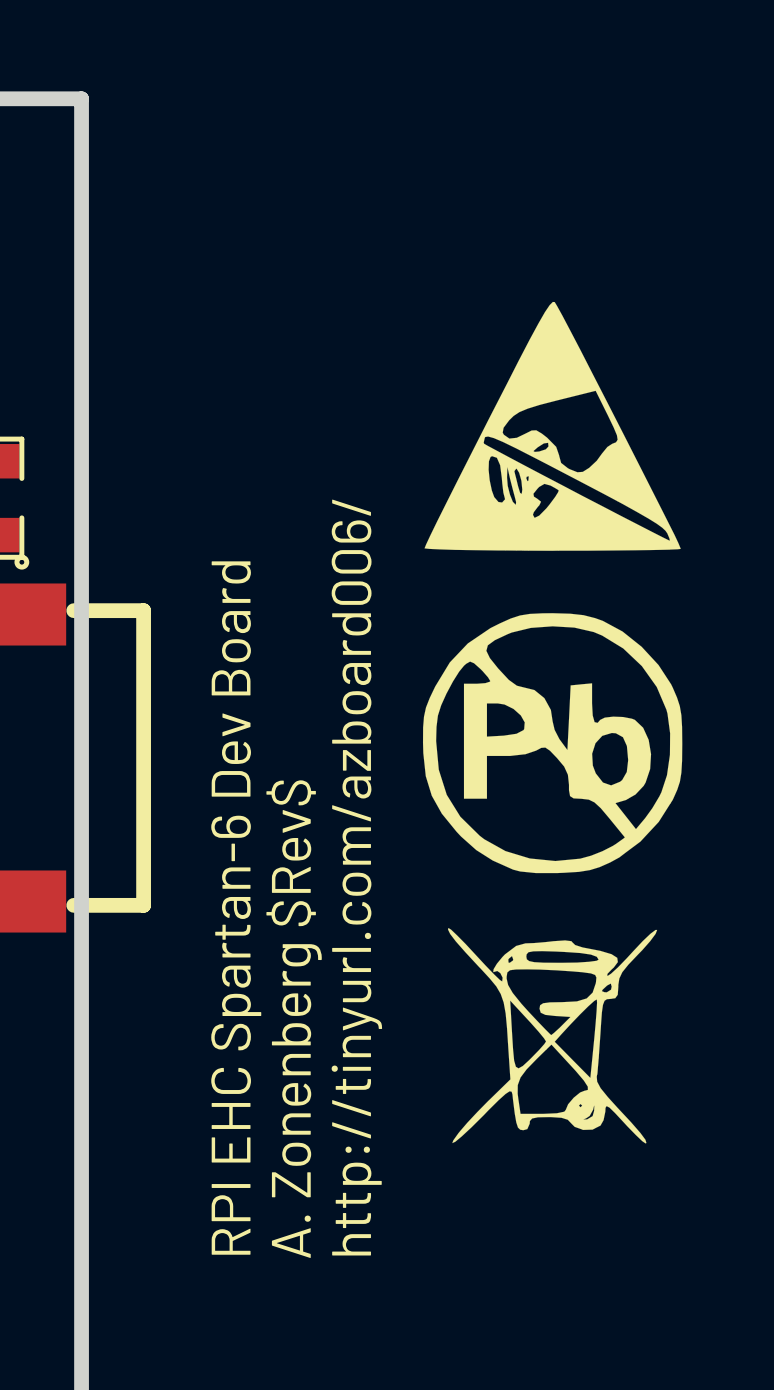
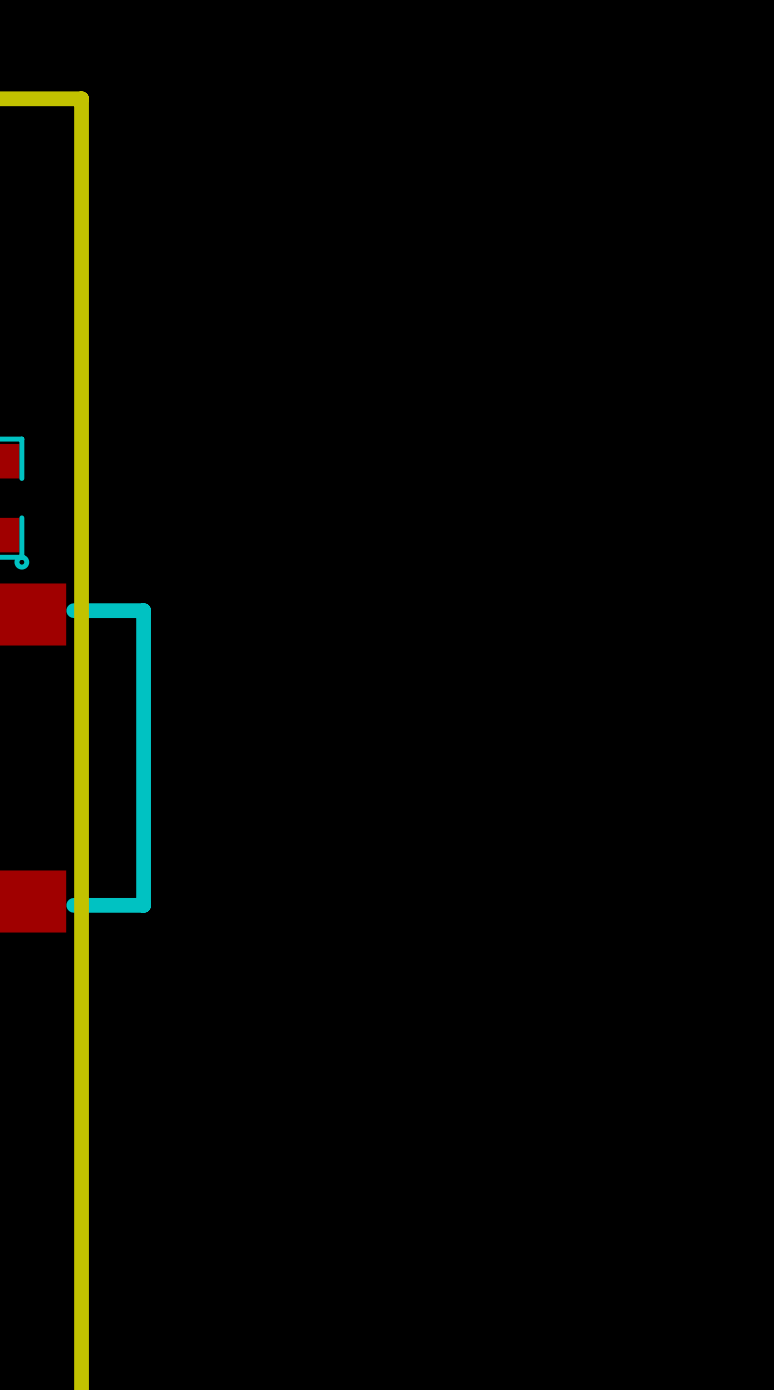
drawing: [424, 301, 681, 551] -> none
drawing: [422, 613, 683, 874] -> none
text: http://tinyurl.com/azboard006/ (356, 877) -> none
text: RPI EHC Spartan-6 Dev Board (236, 908) -> none
drawing: [447, 927, 658, 1144] -> none
text: A. Zonenberg $Rev$ (294, 1019) -> none

